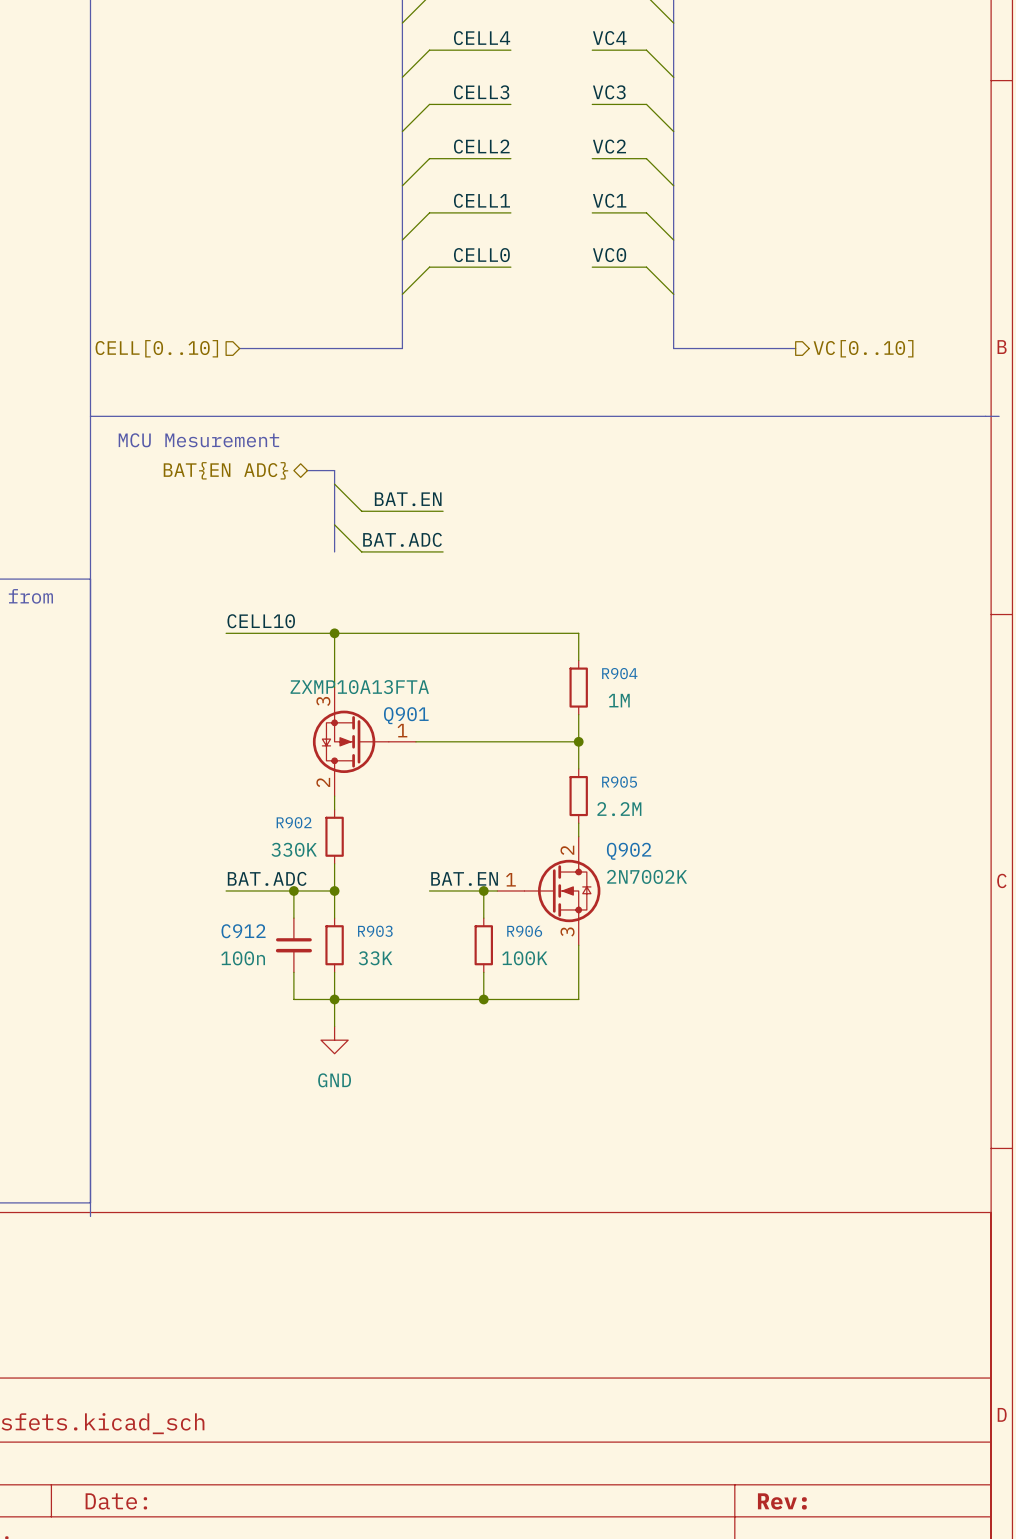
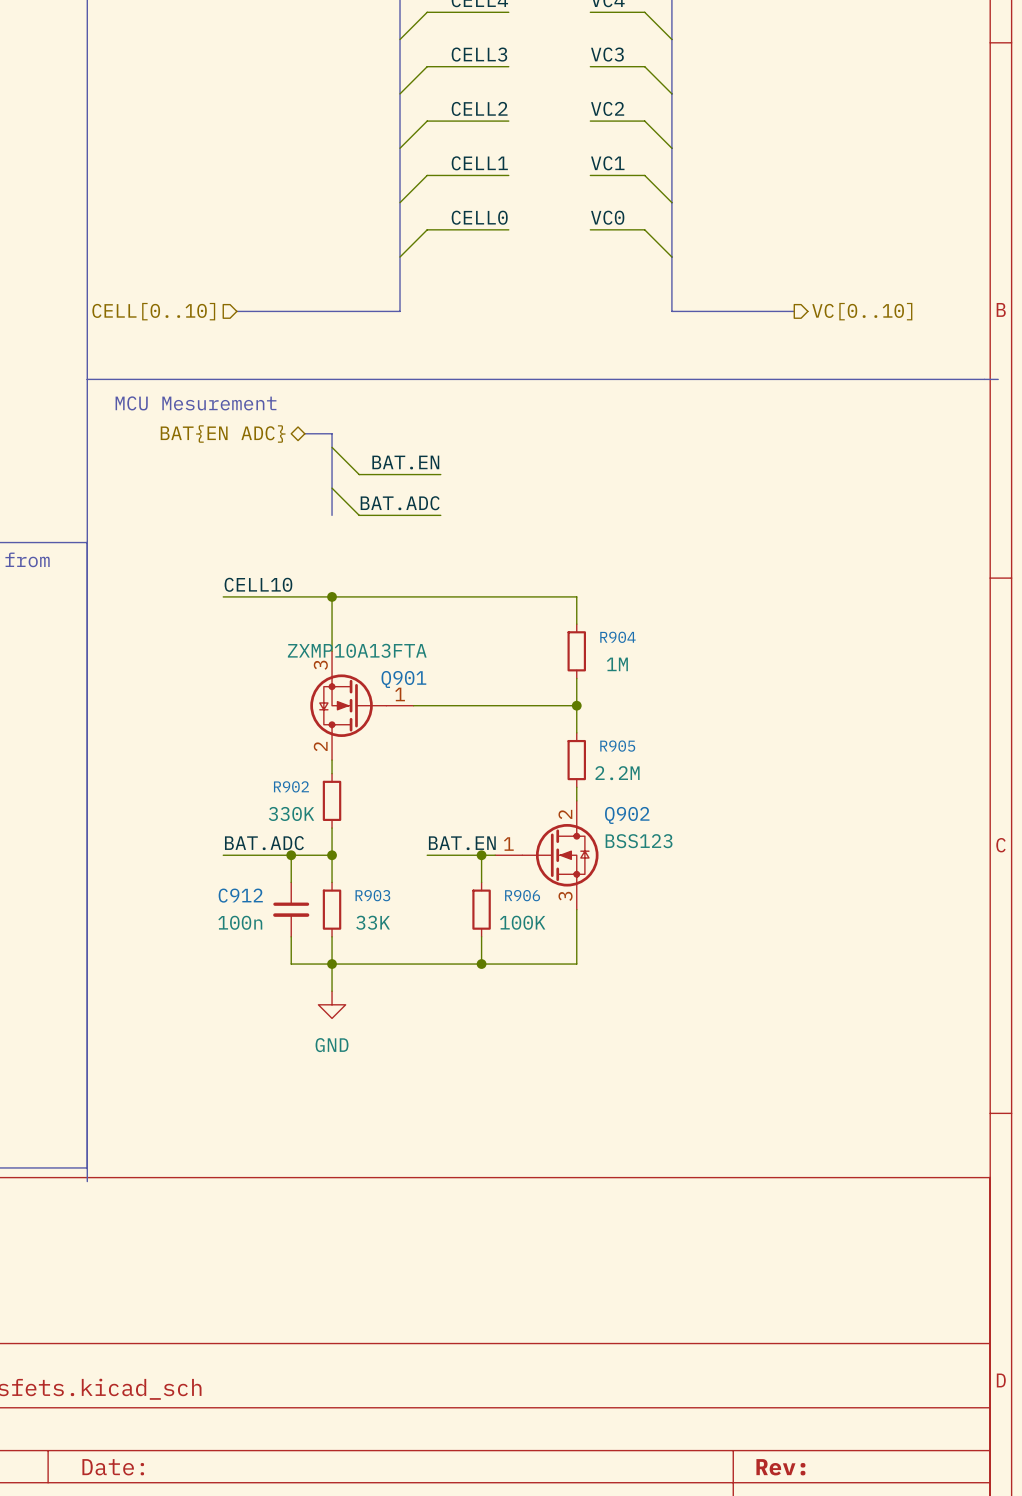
Q902 value: 2N7002K (647, 876) -> BSS123 (639, 841)

